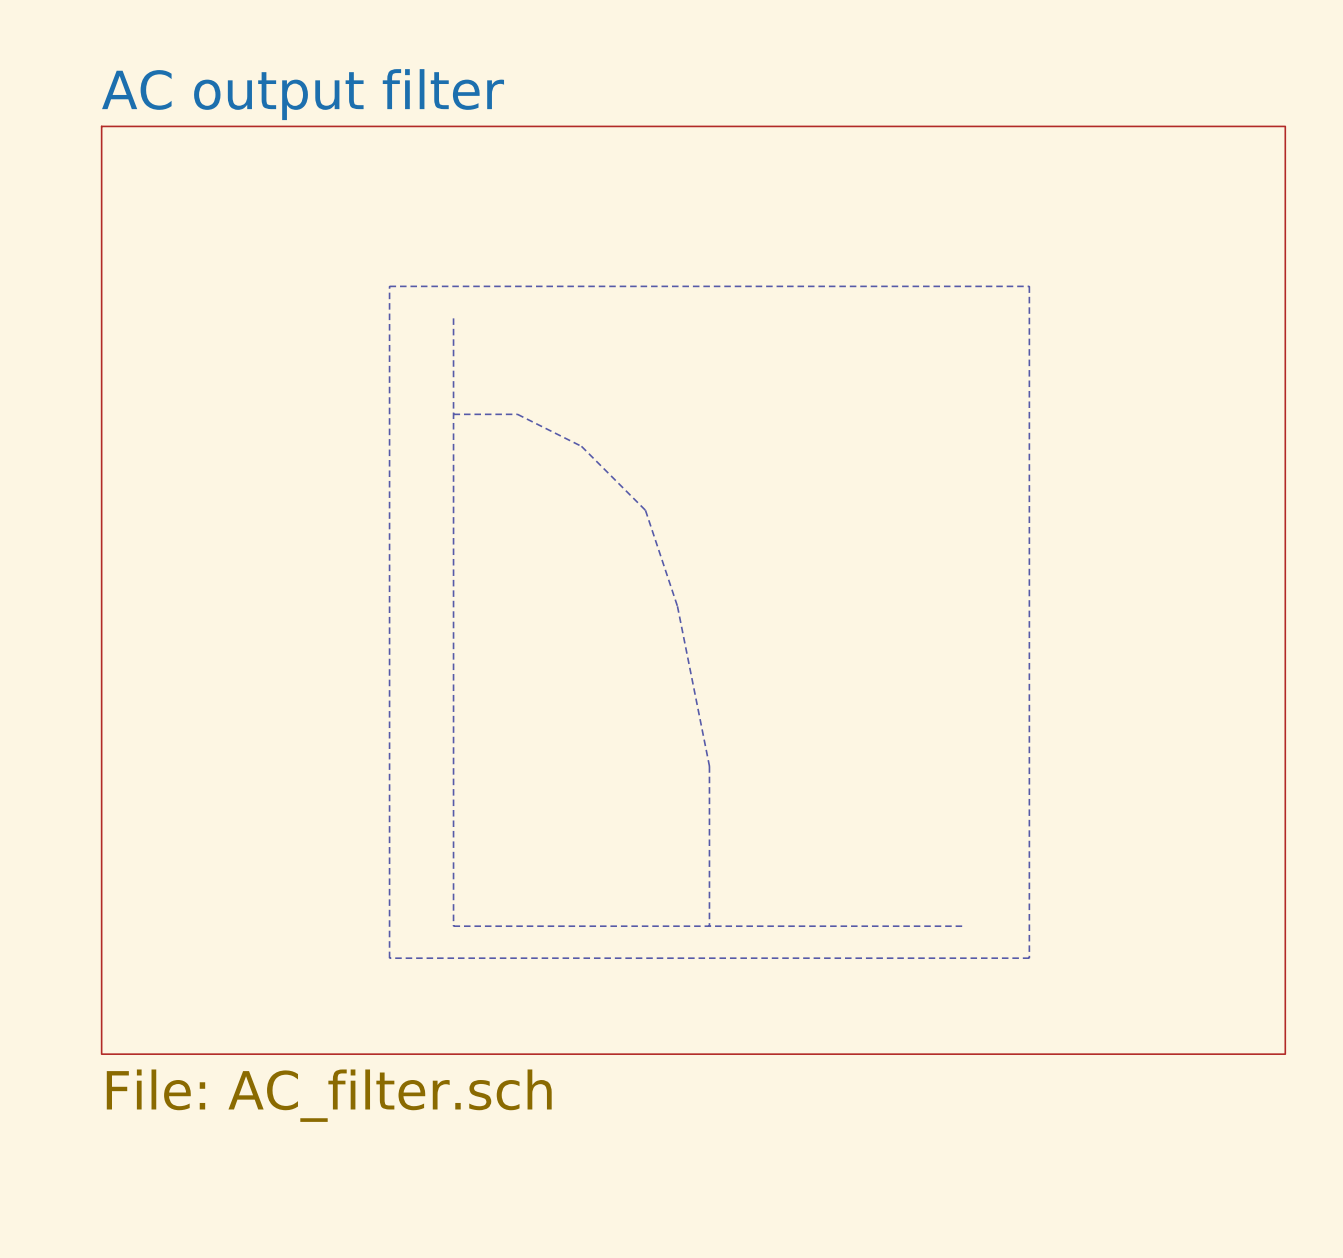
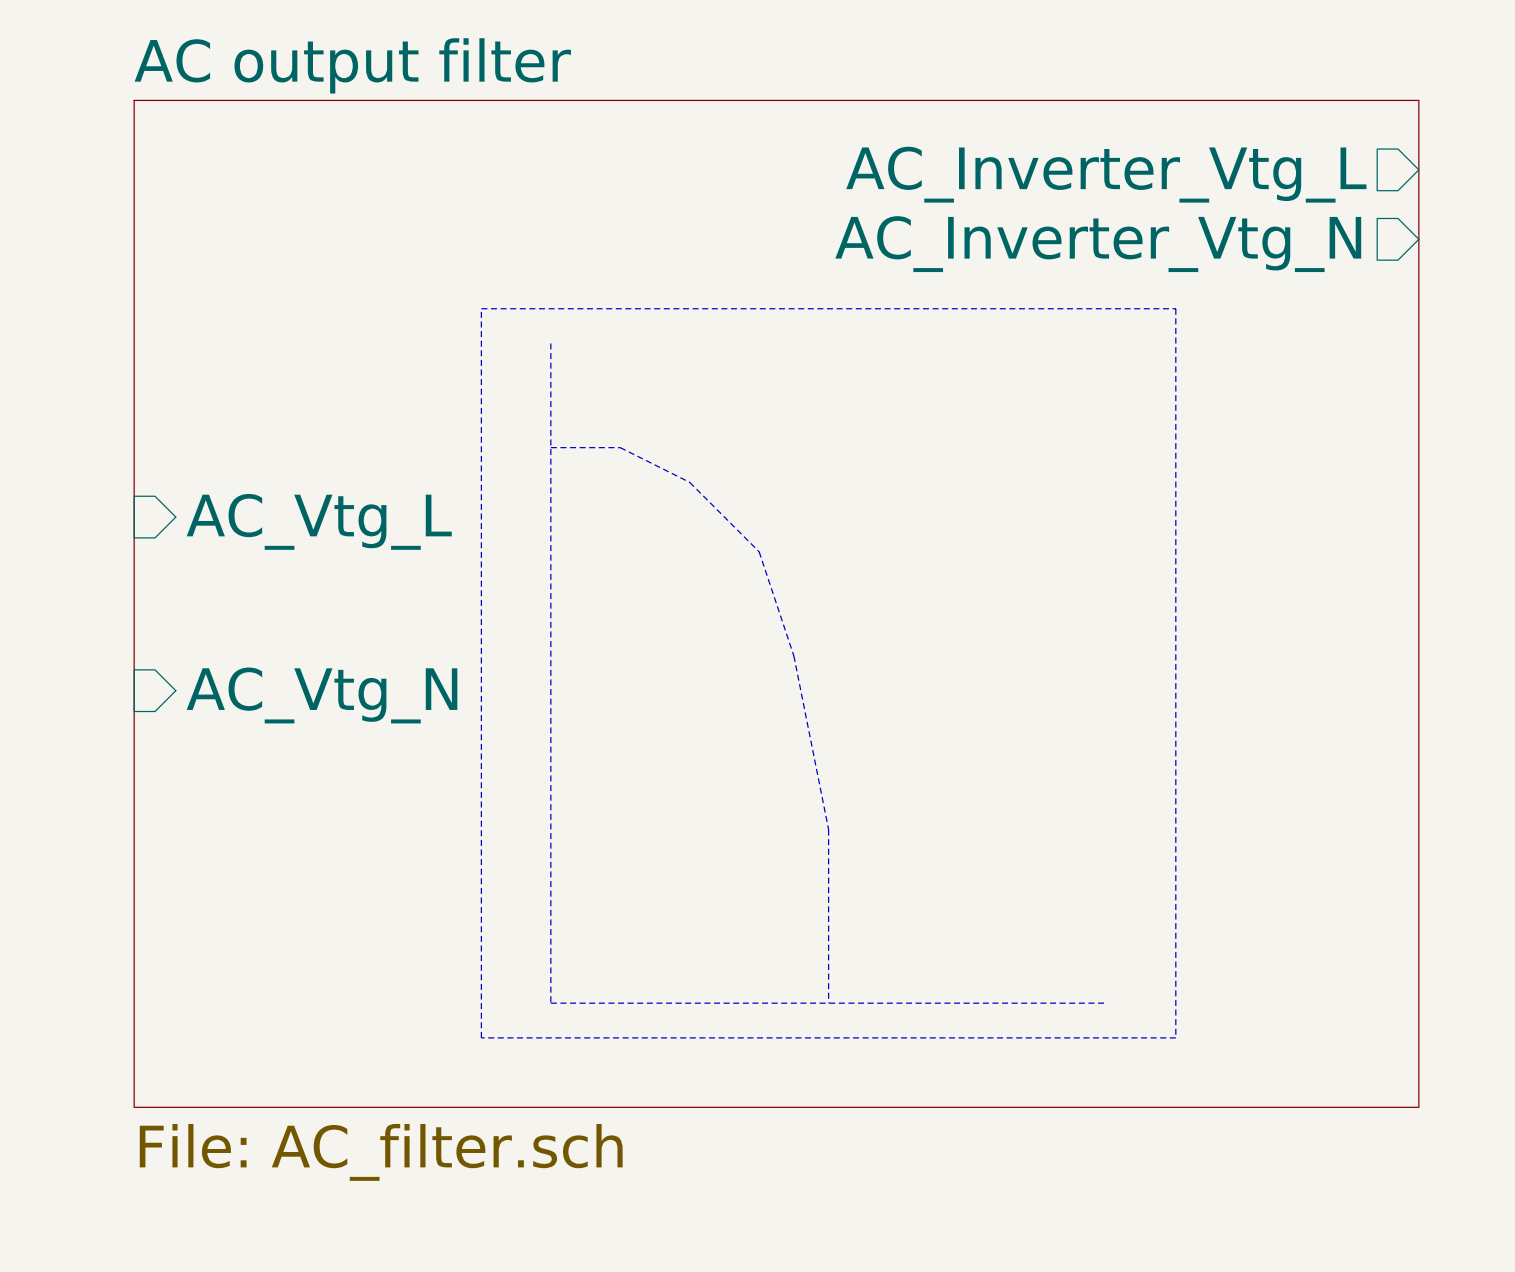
sheet pin: none -> AC_Inverter_Vtg_L (1106, 174)
sheet pin: none -> AC_Inverter_Vtg_N (1098, 244)
sheet pin: none -> AC_Vtg_L (319, 521)
sheet AC output filter position: (693, 590) -> (776, 603)
sheet pin: none -> AC_Vtg_N (322, 695)

